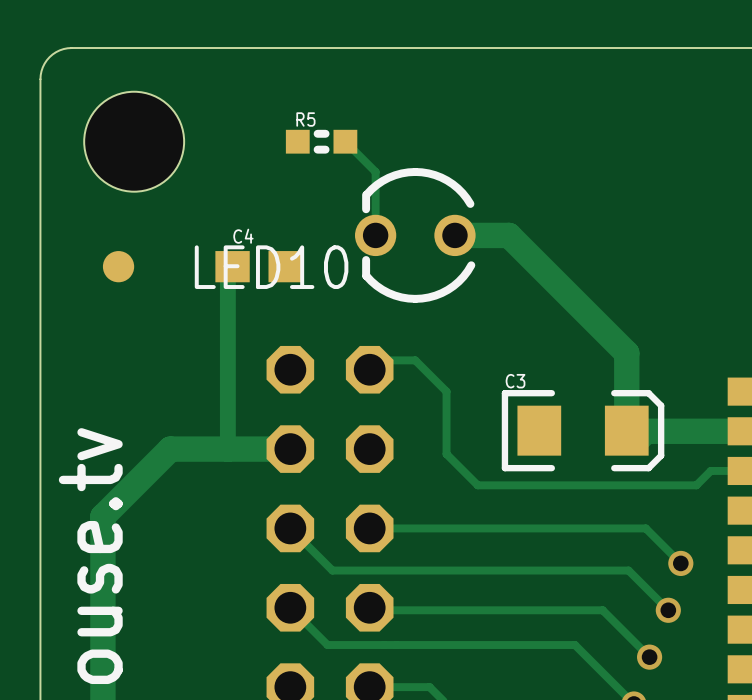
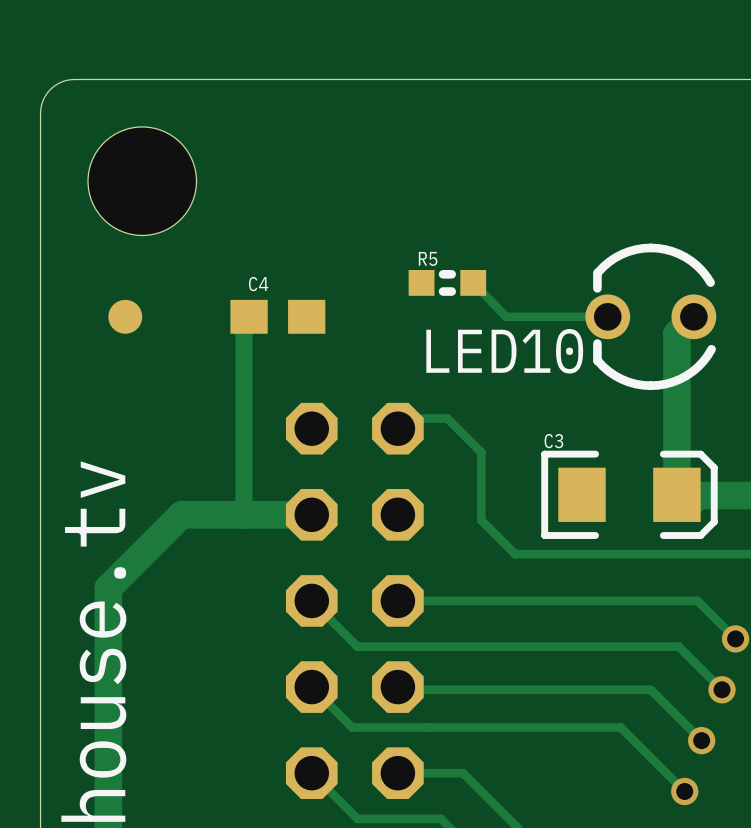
R5 position: (321, 141) -> (447, 282)
track: (345, 141) (375, 171) (375, 235) -> none
LED10 position: (415, 235) -> (650, 316)
track: none -> (473, 282) (506, 316) (607, 316)
track: (454, 235) (509, 235) (626, 353) -> (693, 316) (676, 333) (676, 410)

